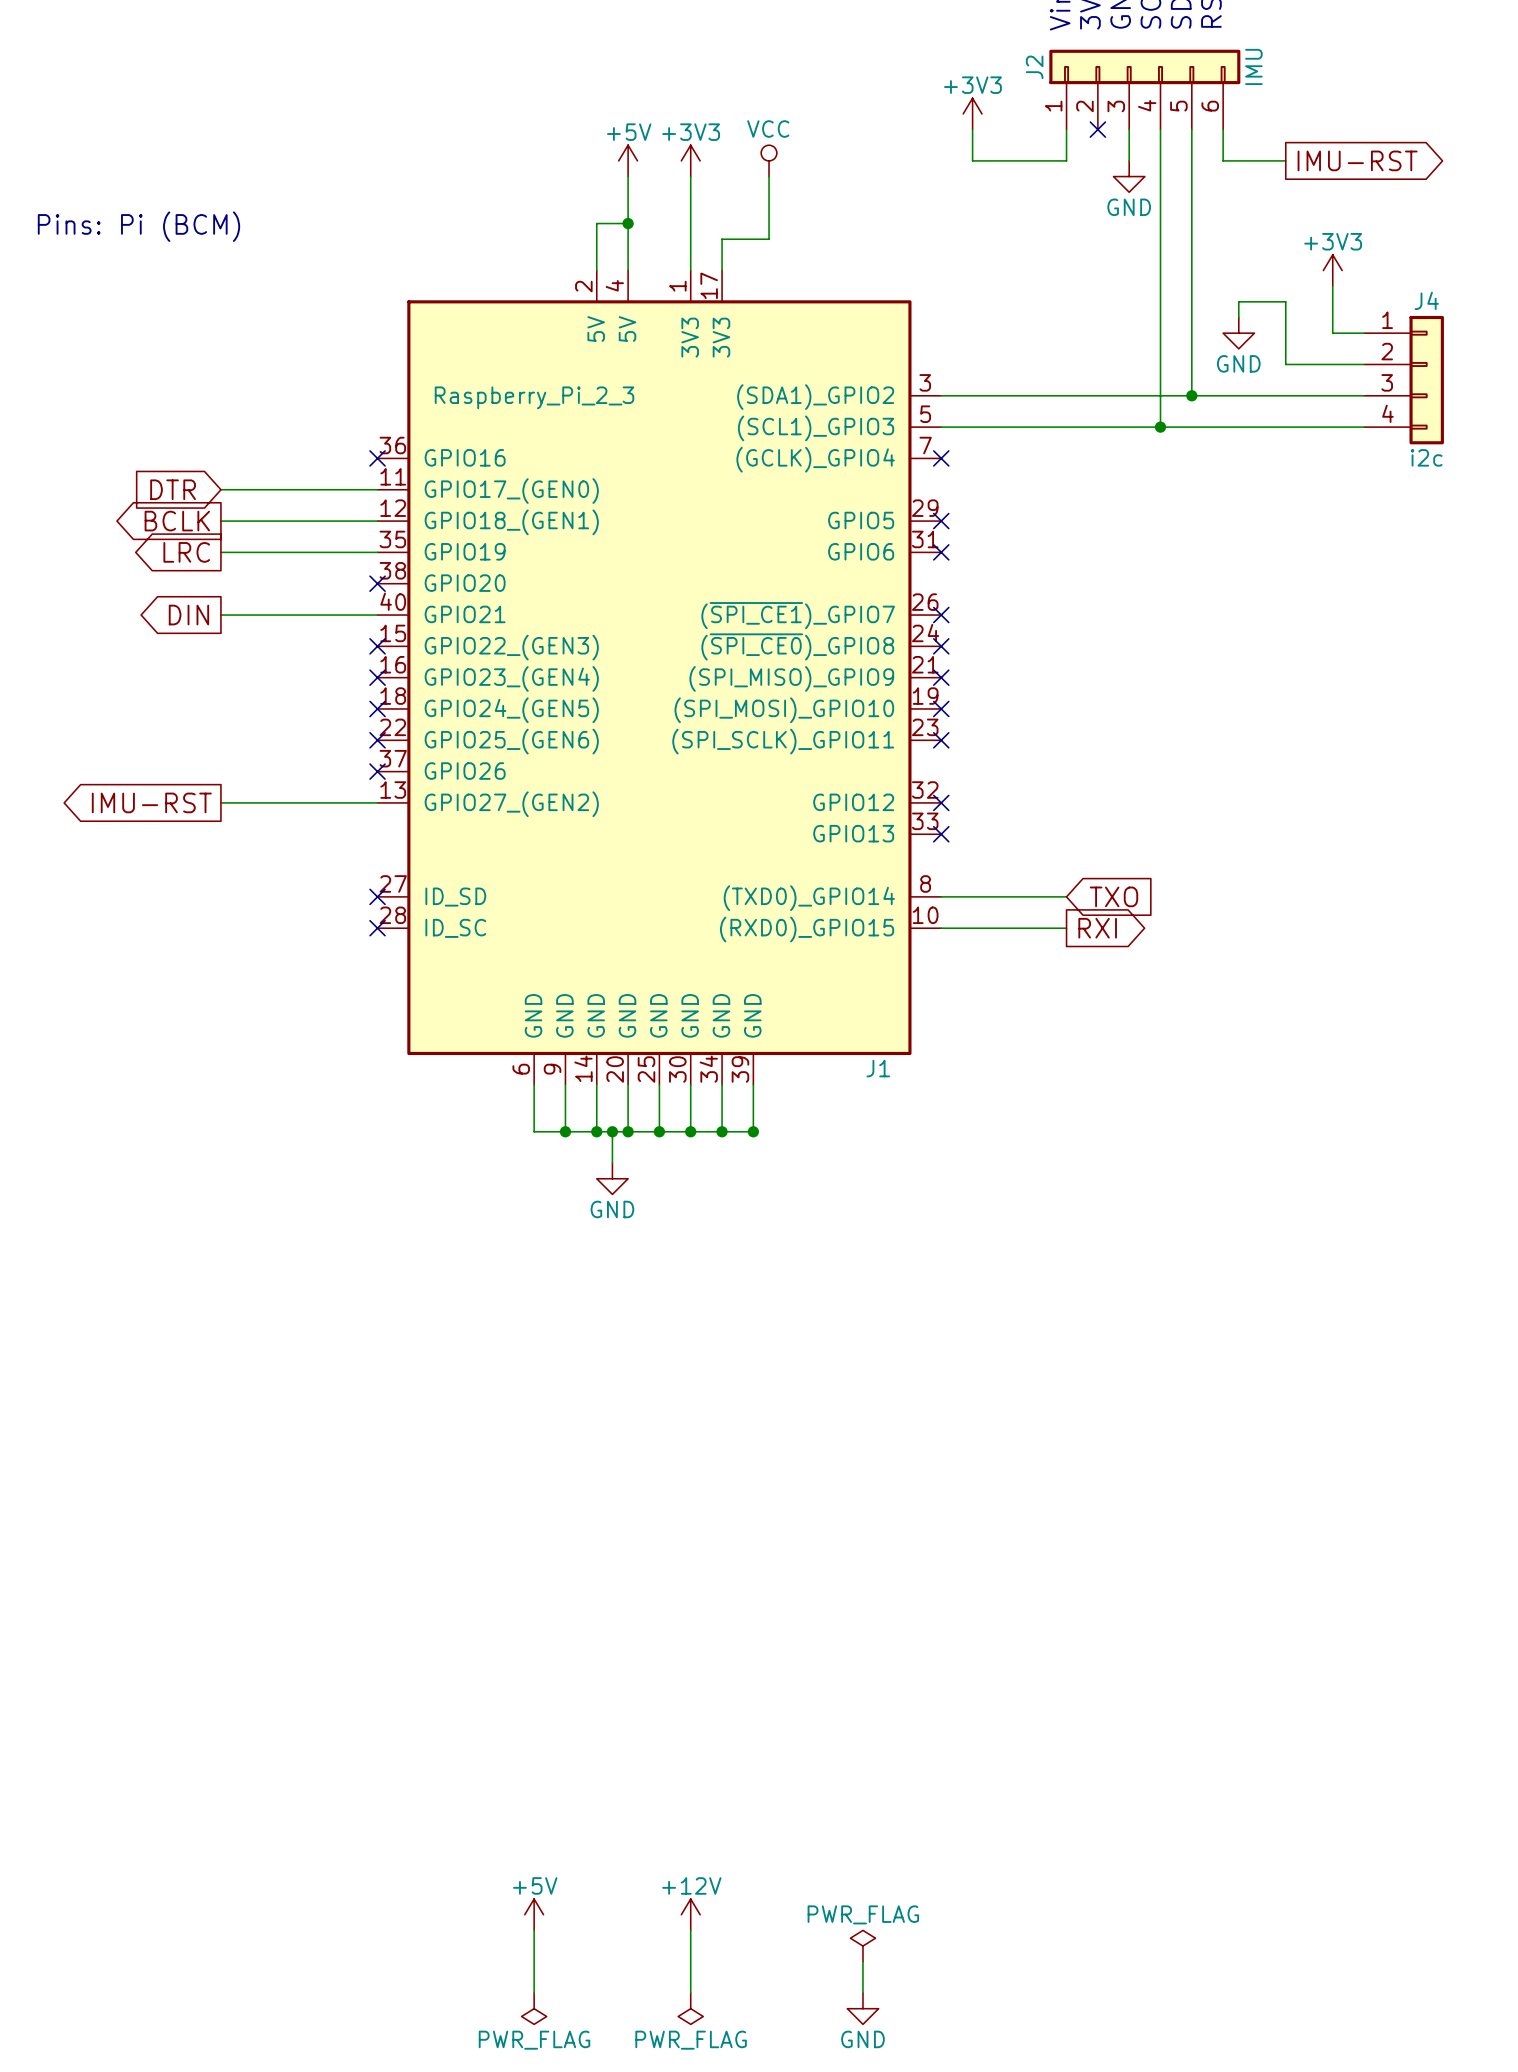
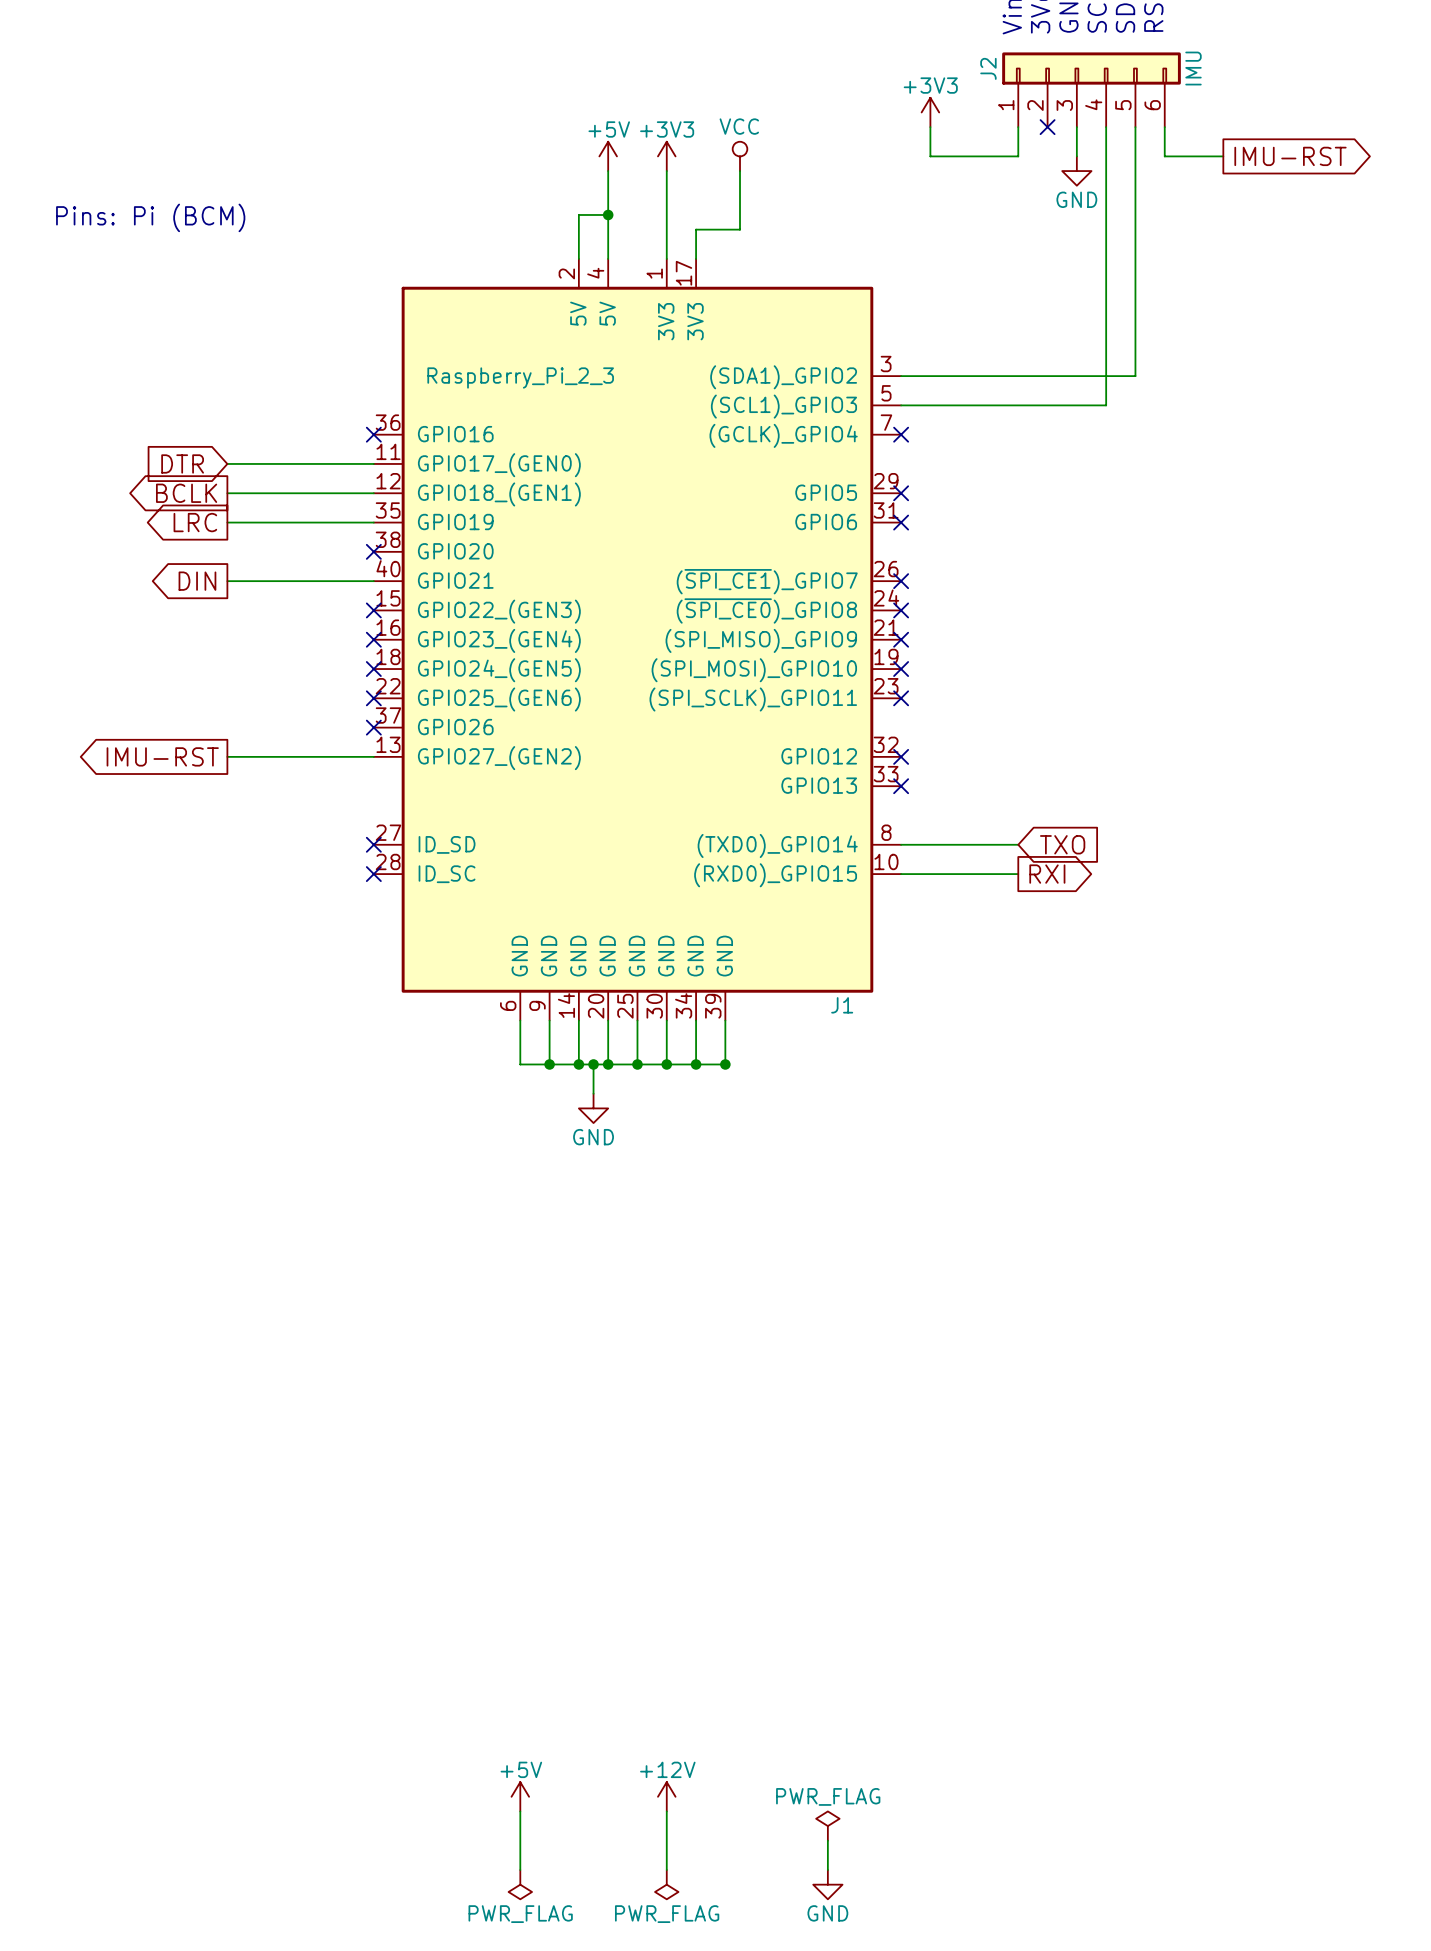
power symbol: +3V3 (1332, 270) -> none
wire: (1332, 286) (1332, 333) (1364, 333) -> none
wire: (1238, 317) (1238, 301) (1285, 301) (1285, 364) (1364, 364) -> none
power symbol: GND (1238, 333) -> none
J4: i2c (1404, 380) -> none
wire: (1191, 395) (1364, 395) -> none
junction: (1191, 395) -> none
wire: (1160, 427) (1364, 427) -> none
junction: (1160, 427) -> none

